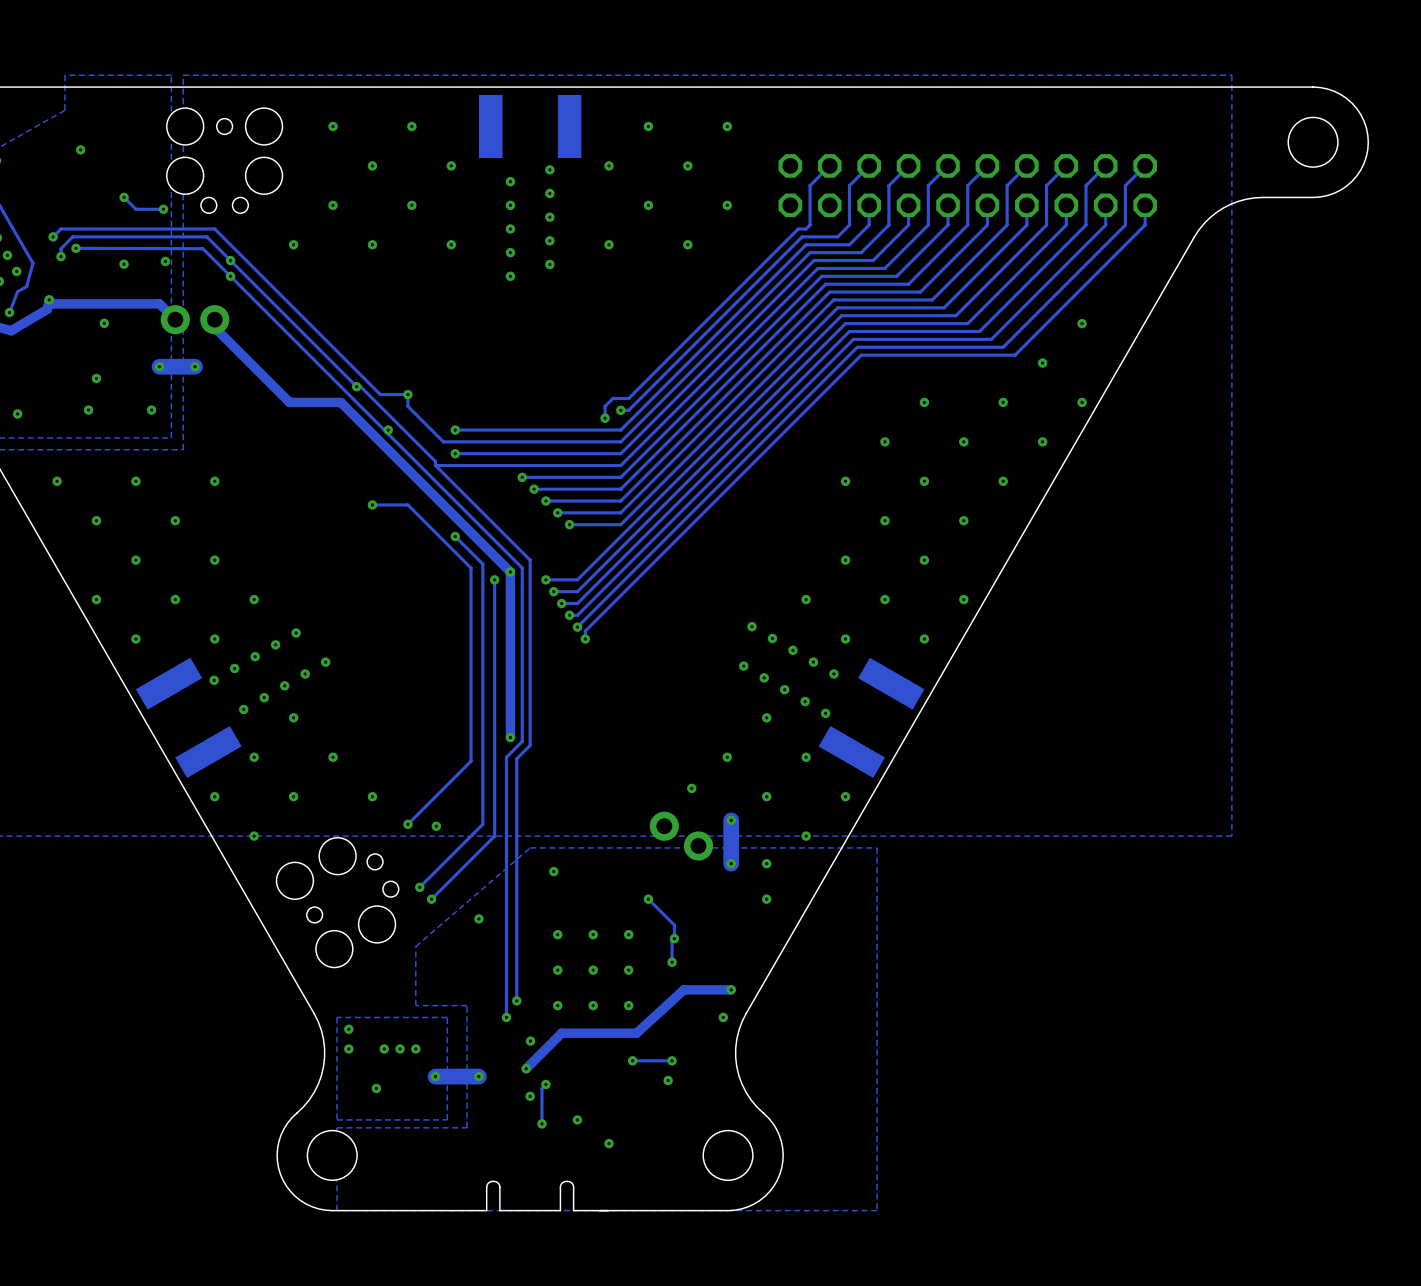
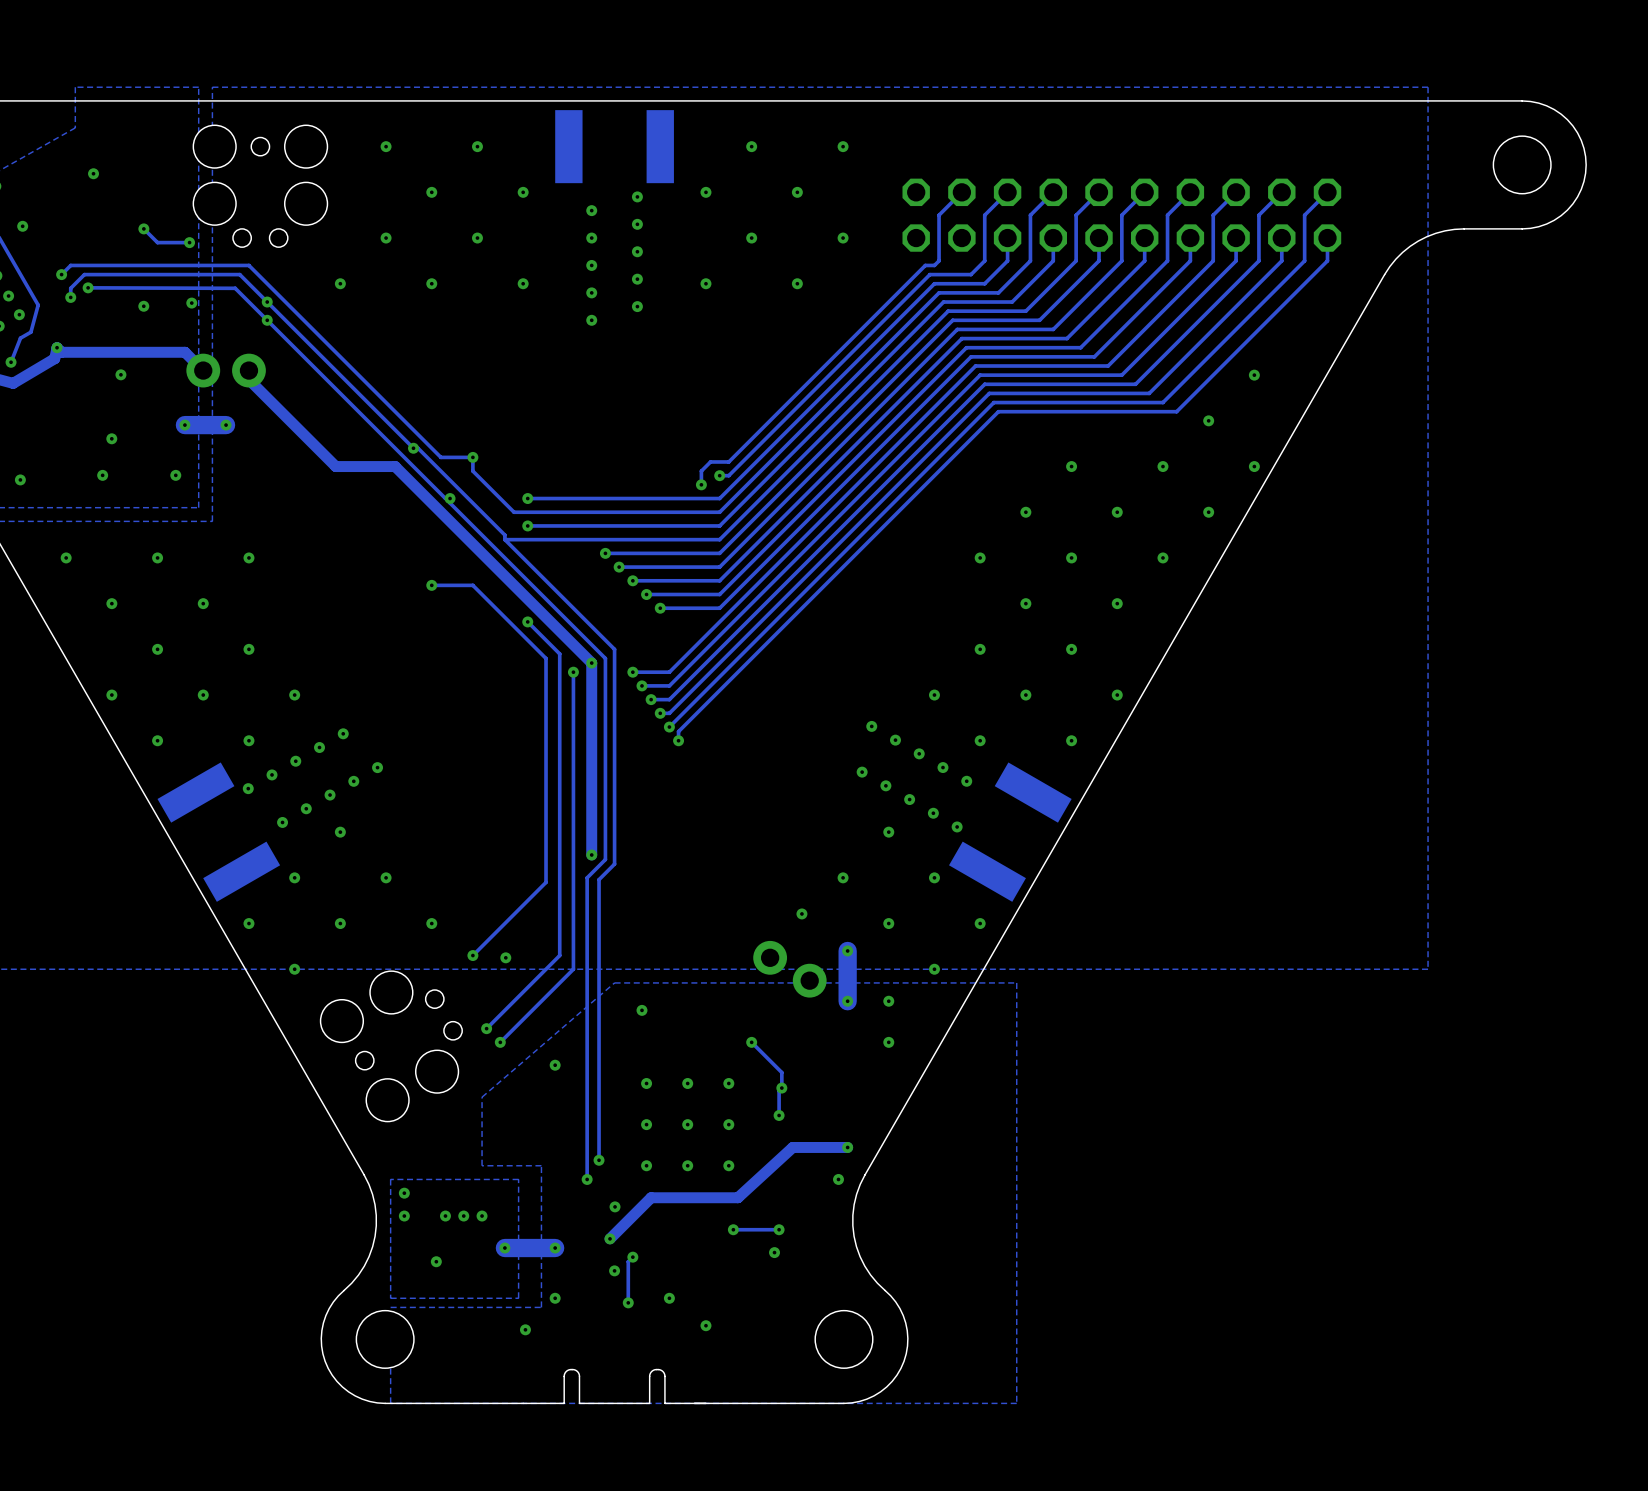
via: none -> (22, 226)
via: none -> (555, 1298)
via: none -> (525, 1329)

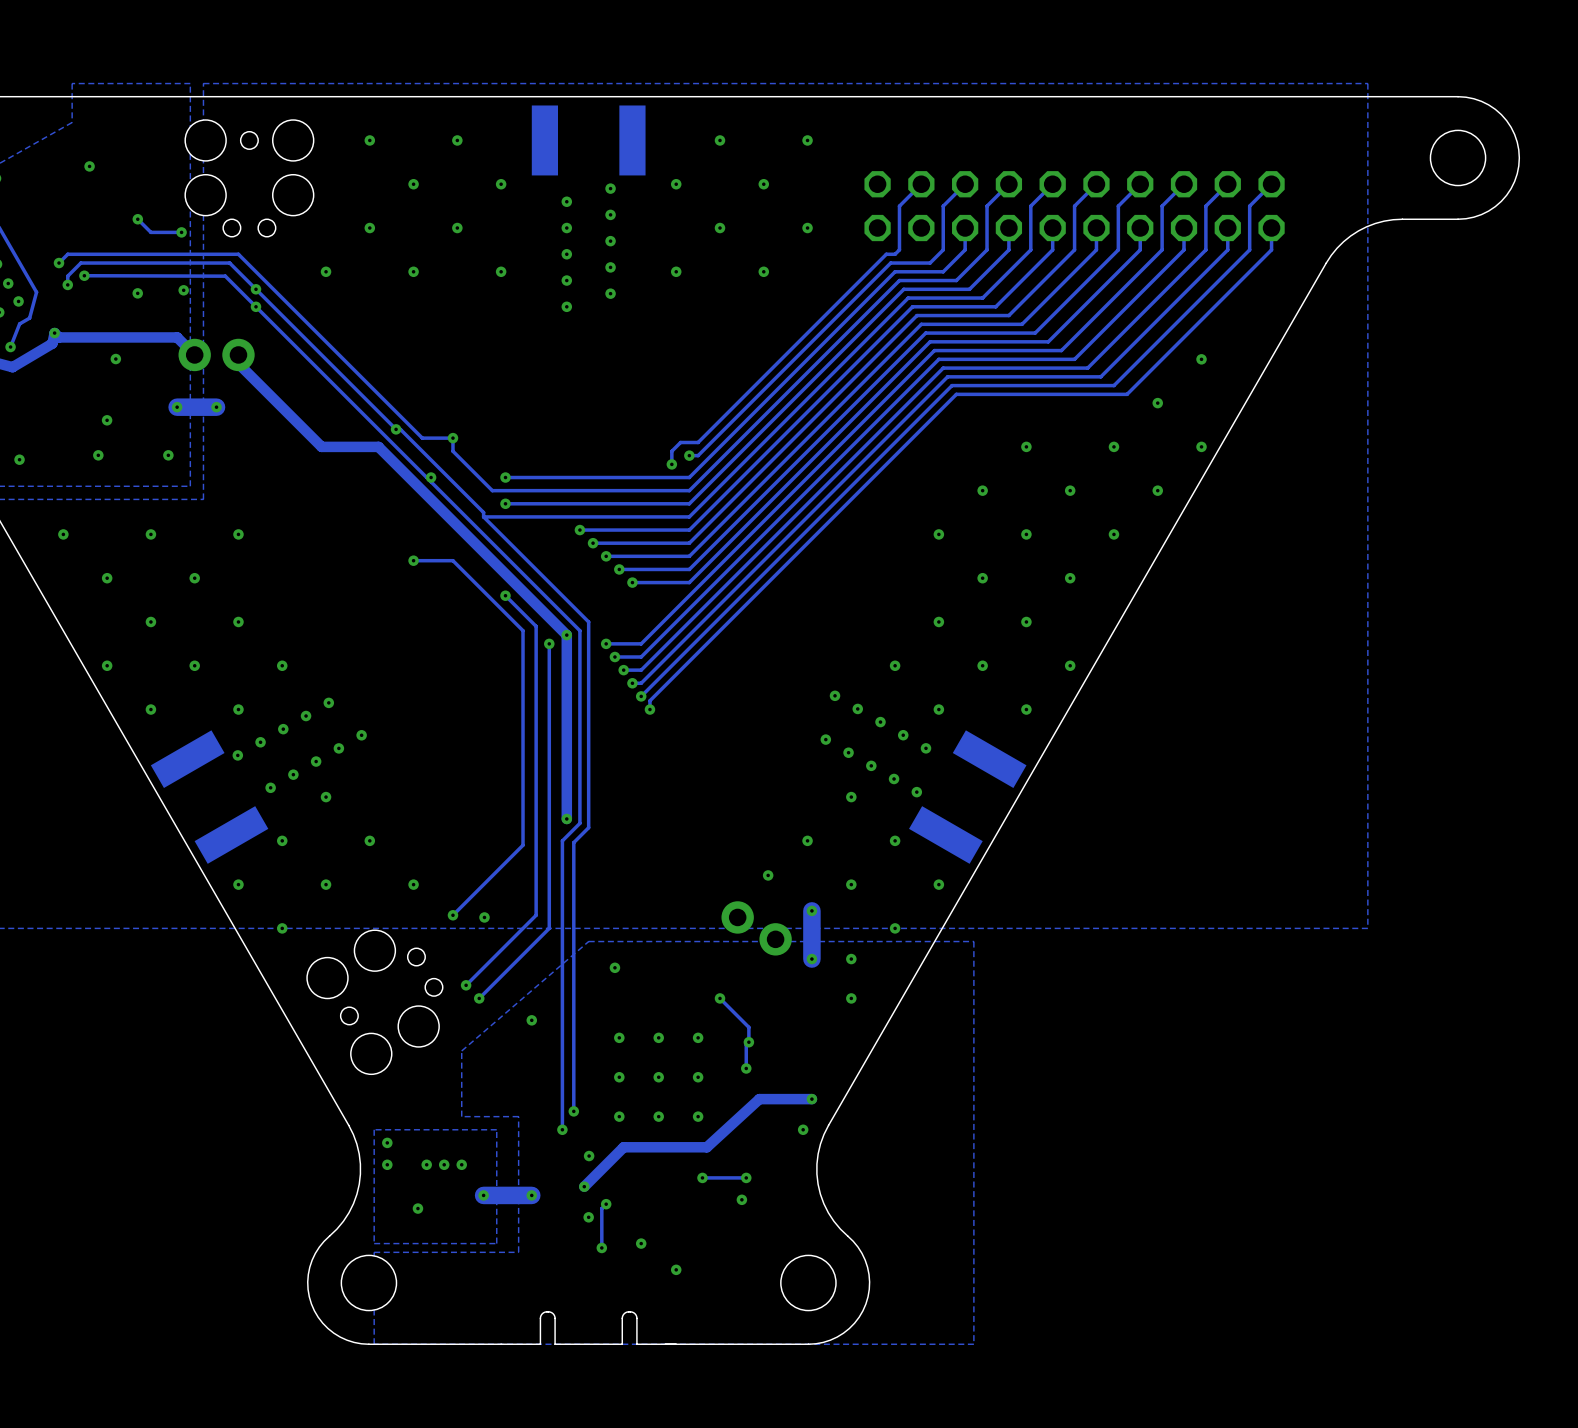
via: (22, 226) -> none
via: (555, 1298) -> none
via: (525, 1329) -> none

